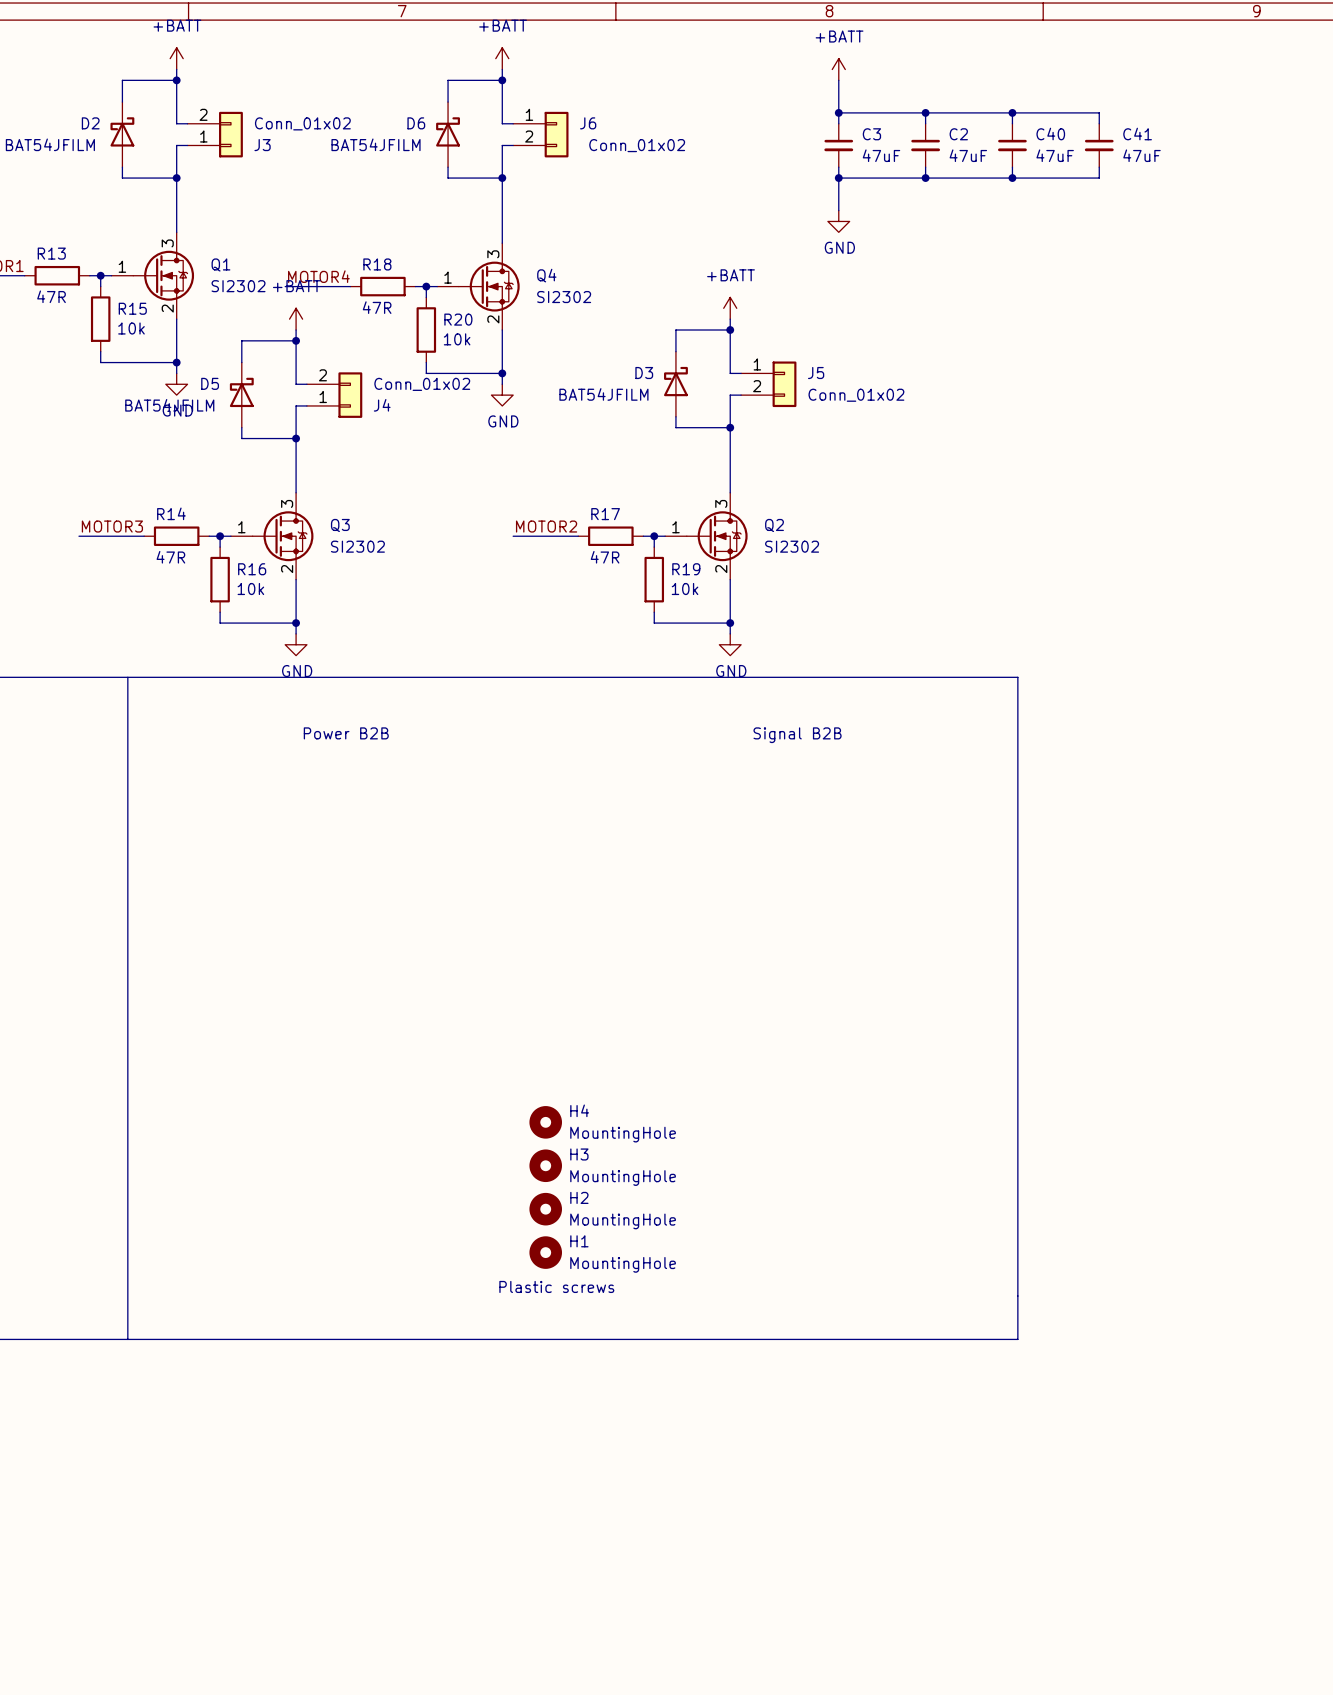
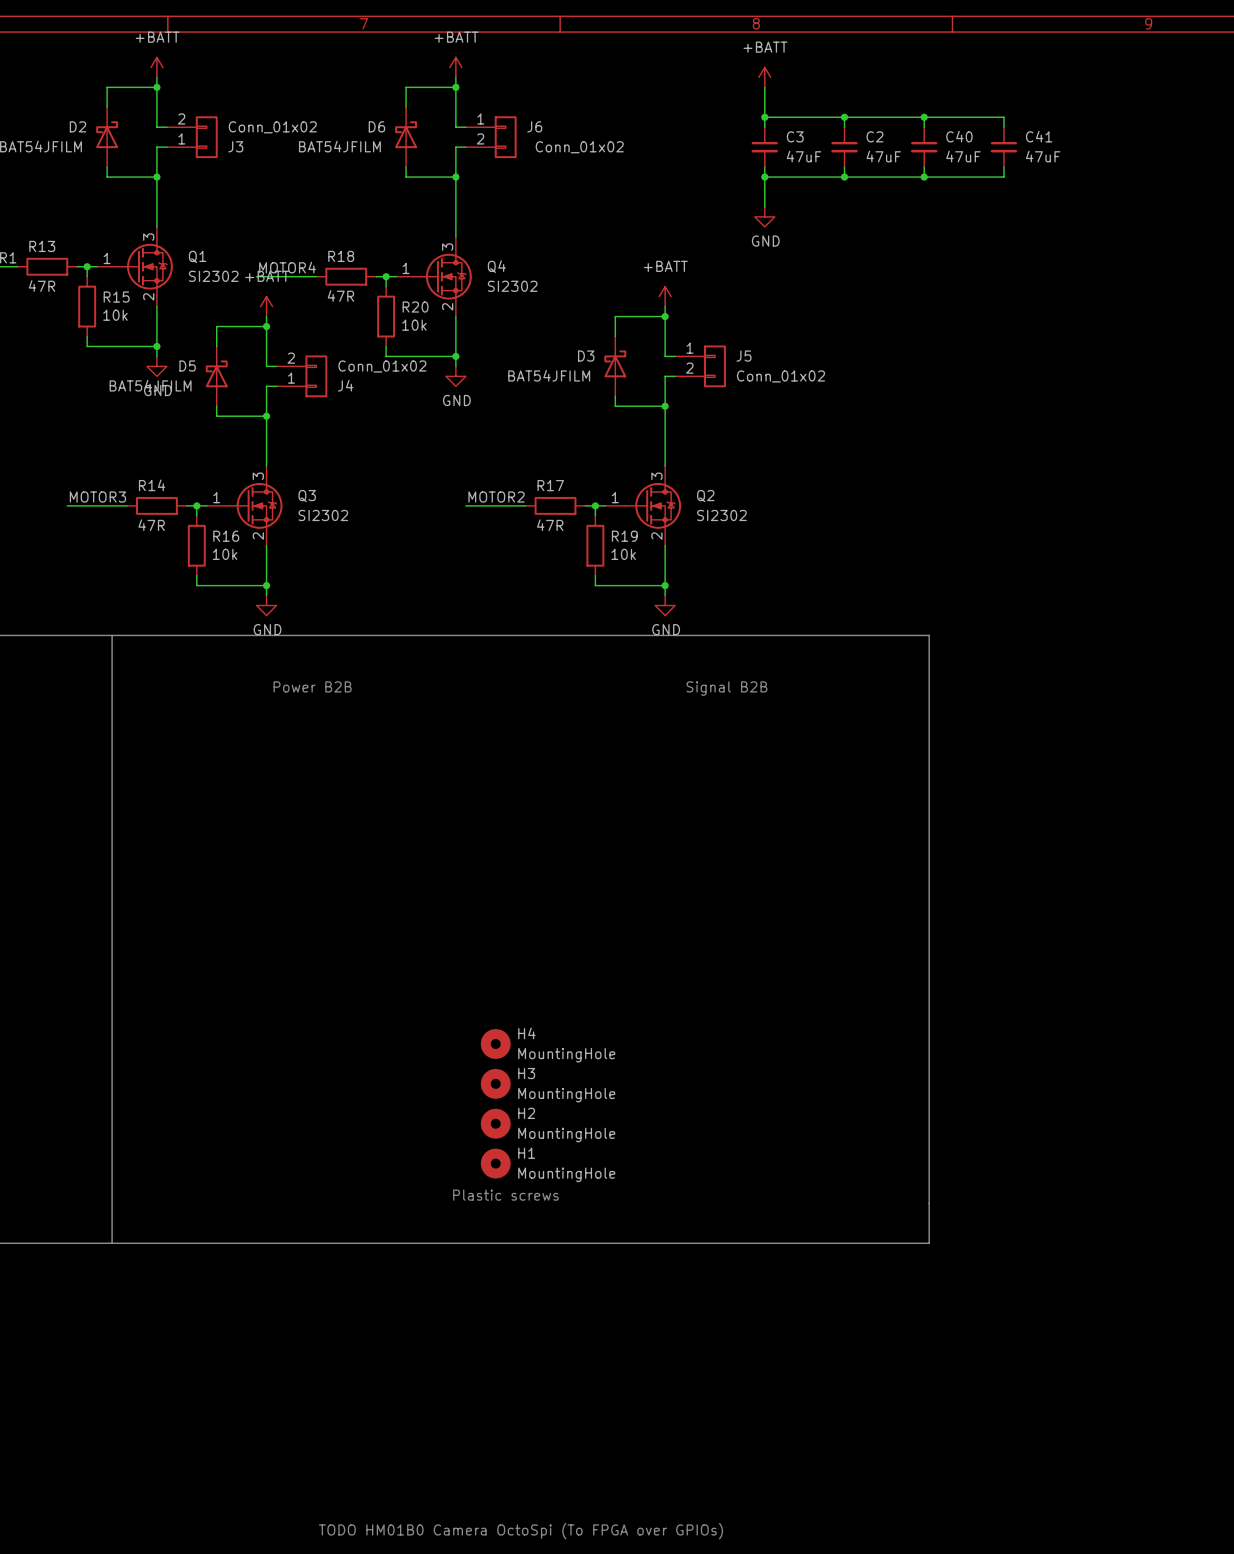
text: none -> TODO HM01B0 Camera OctoSpi (To FPGA over GPIOs) (520, 1531)

